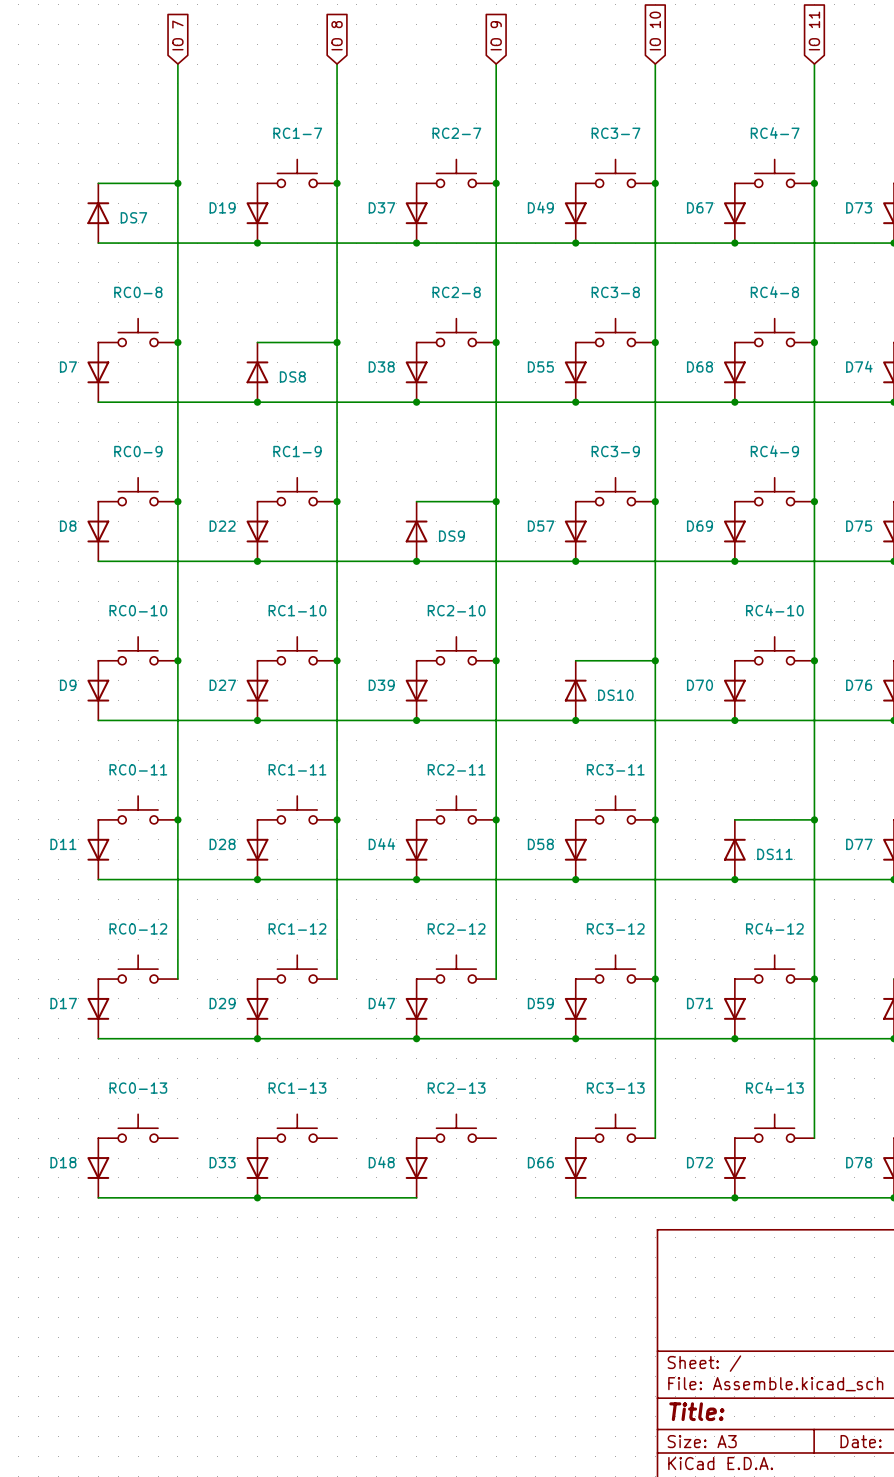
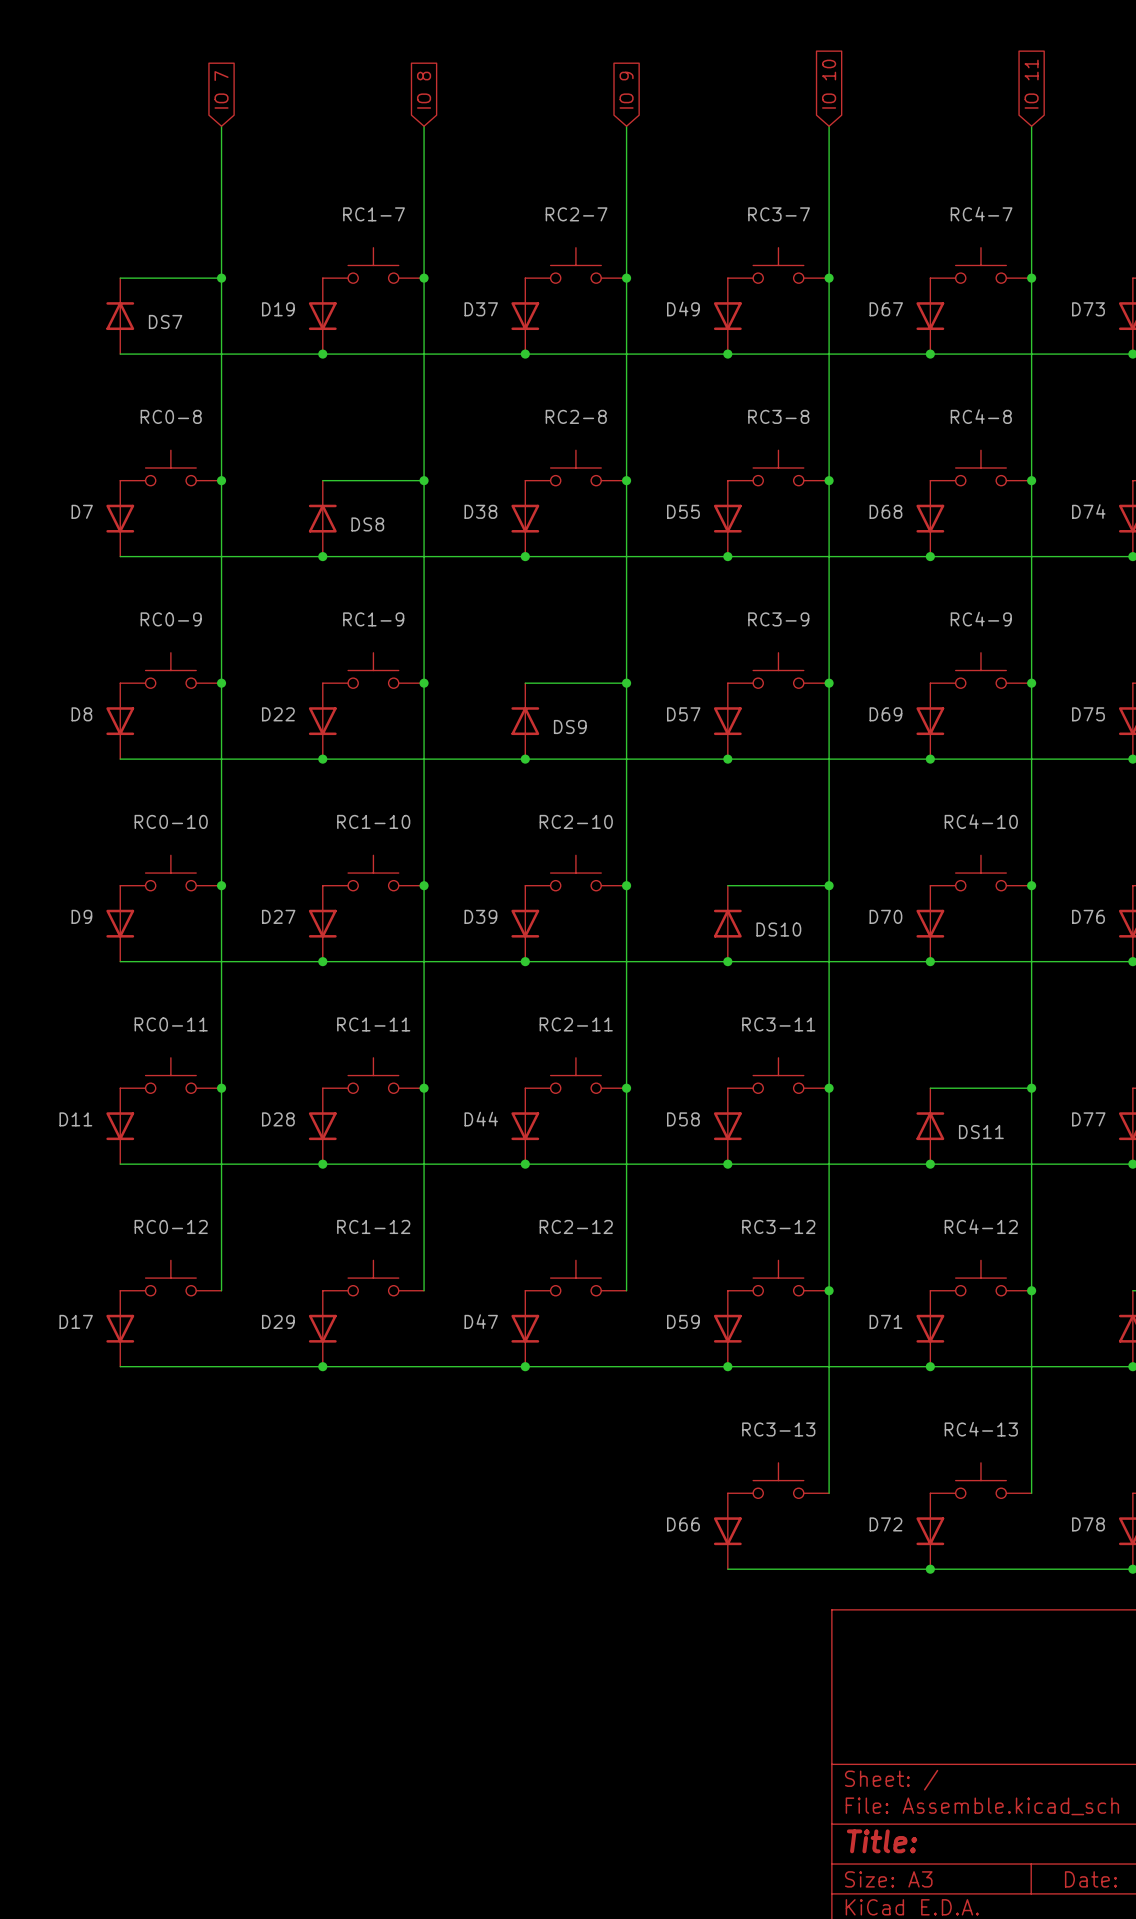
RC0-13: (138, 1128) -> none
RC1-13: (297, 1128) -> none
RC2-13: (456, 1128) -> none
D18: (98, 1168) -> none
D33: (257, 1168) -> none
D48: (416, 1168) -> none
wire: (98, 1197) (416, 1197) -> none
junction: (257, 1197) -> none

